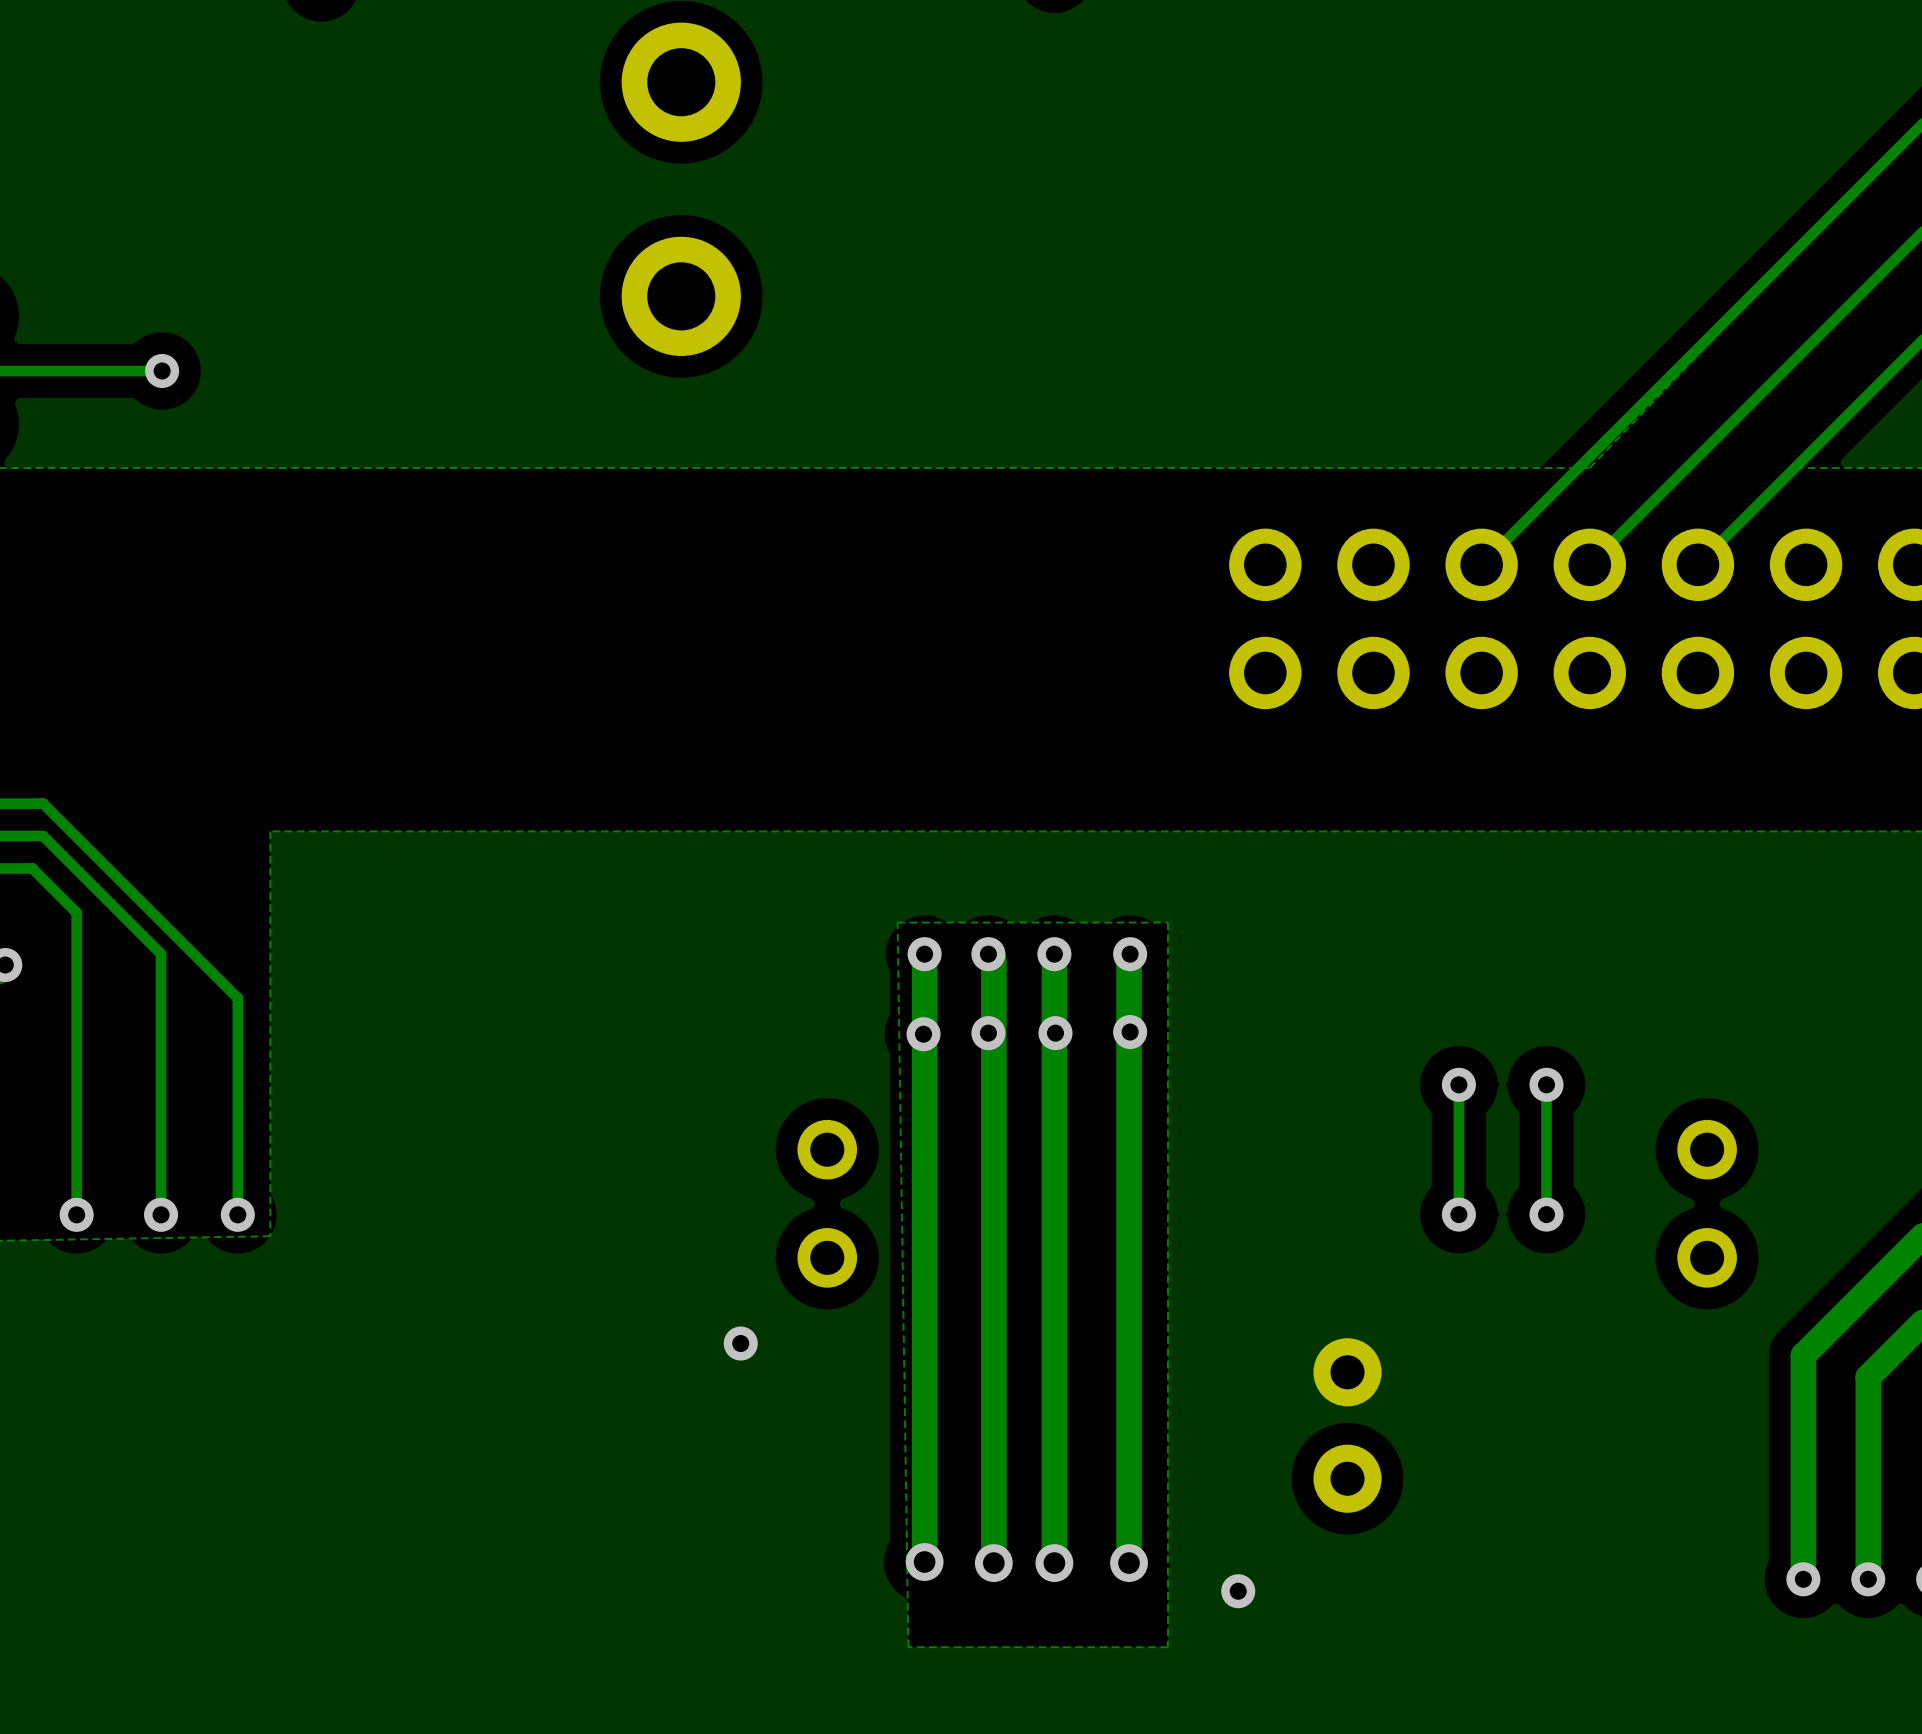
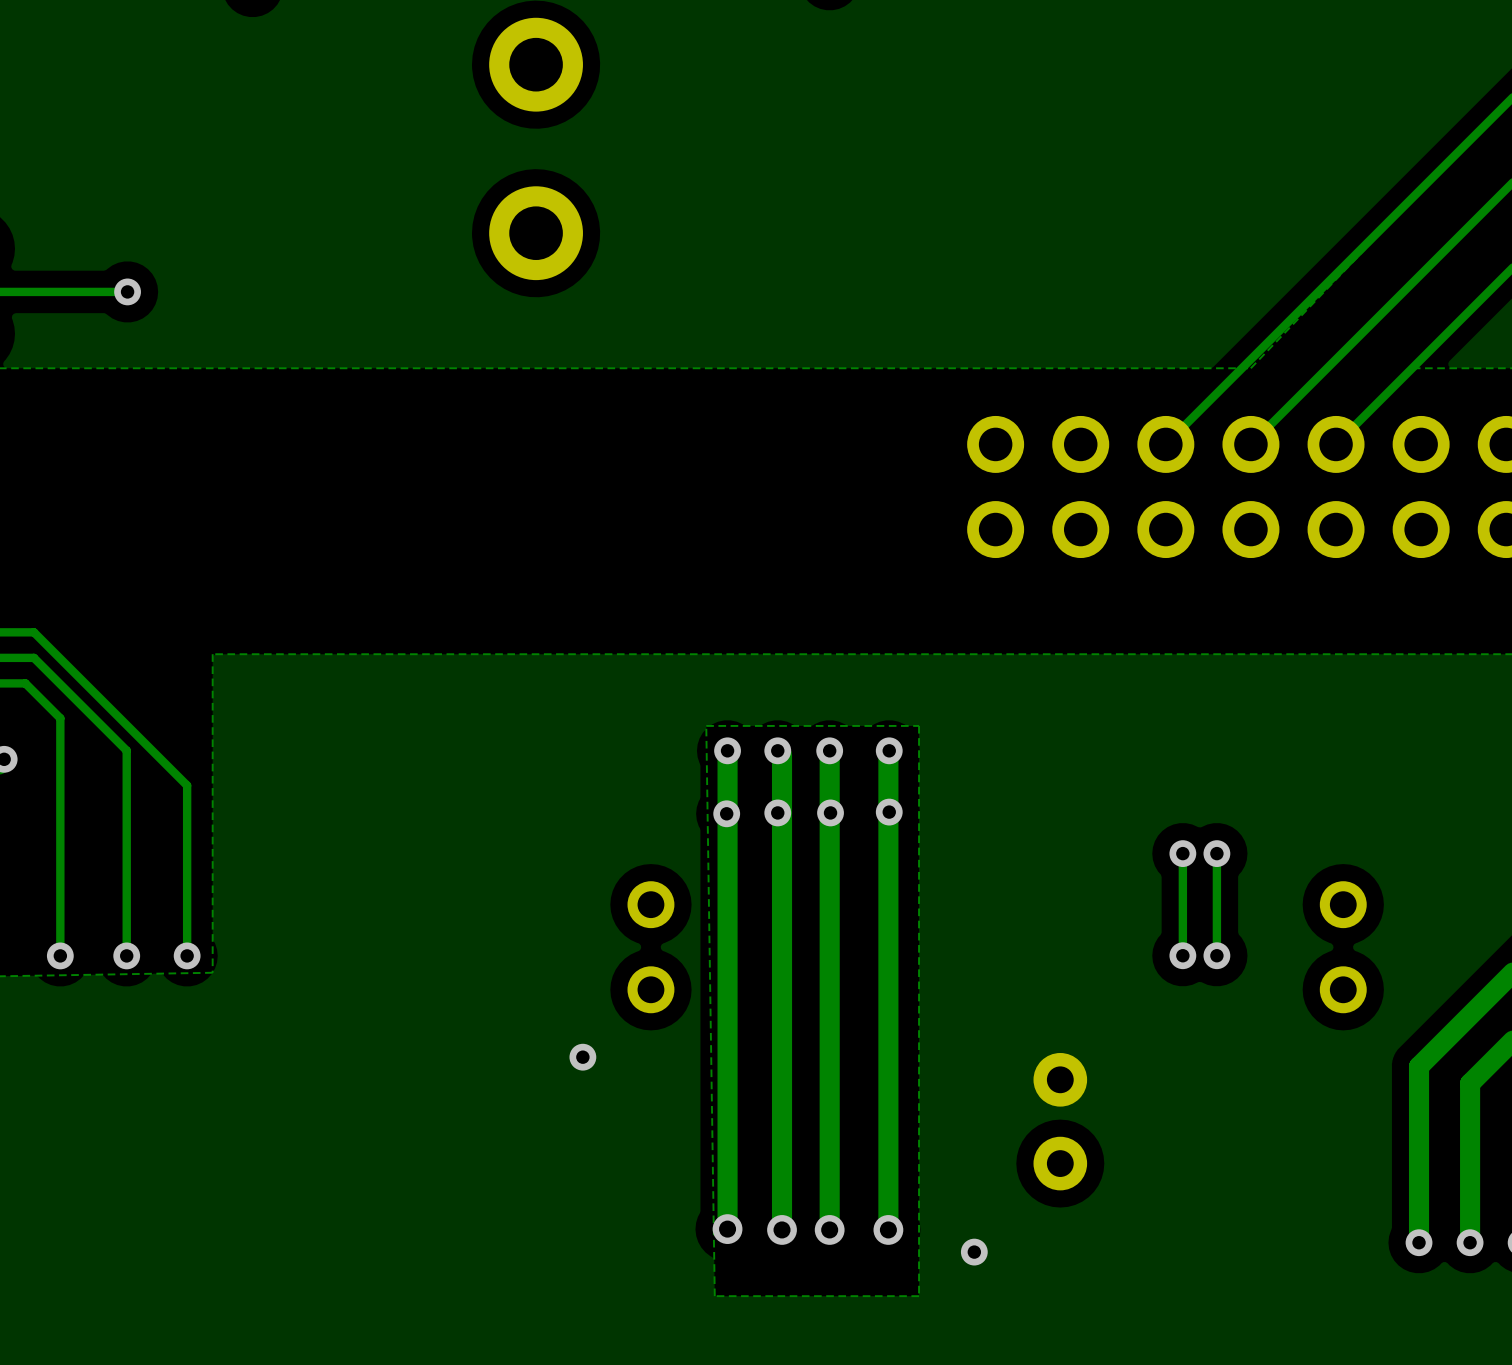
track: (1458, 1084) (1458, 1214) -> (1182, 853) (1182, 955)
via position: (1458, 1084) -> (1182, 853)
via position: (1458, 1214) -> (1182, 955)

